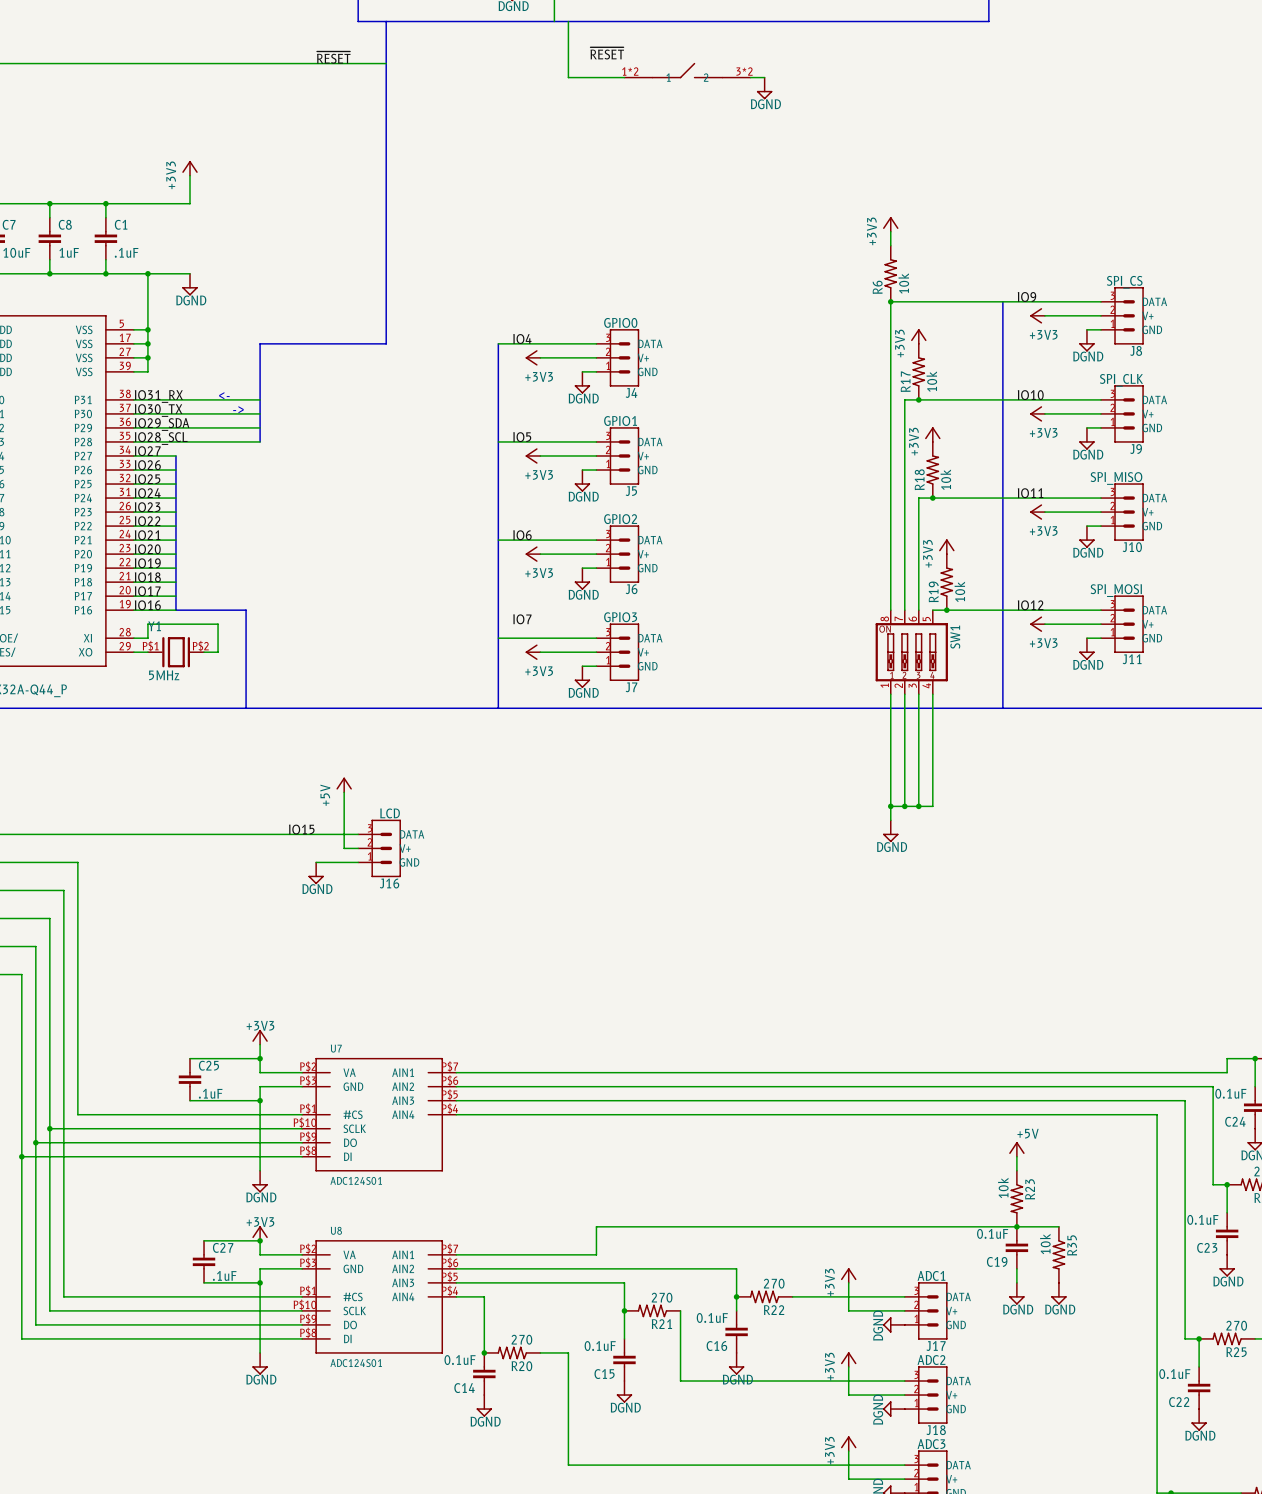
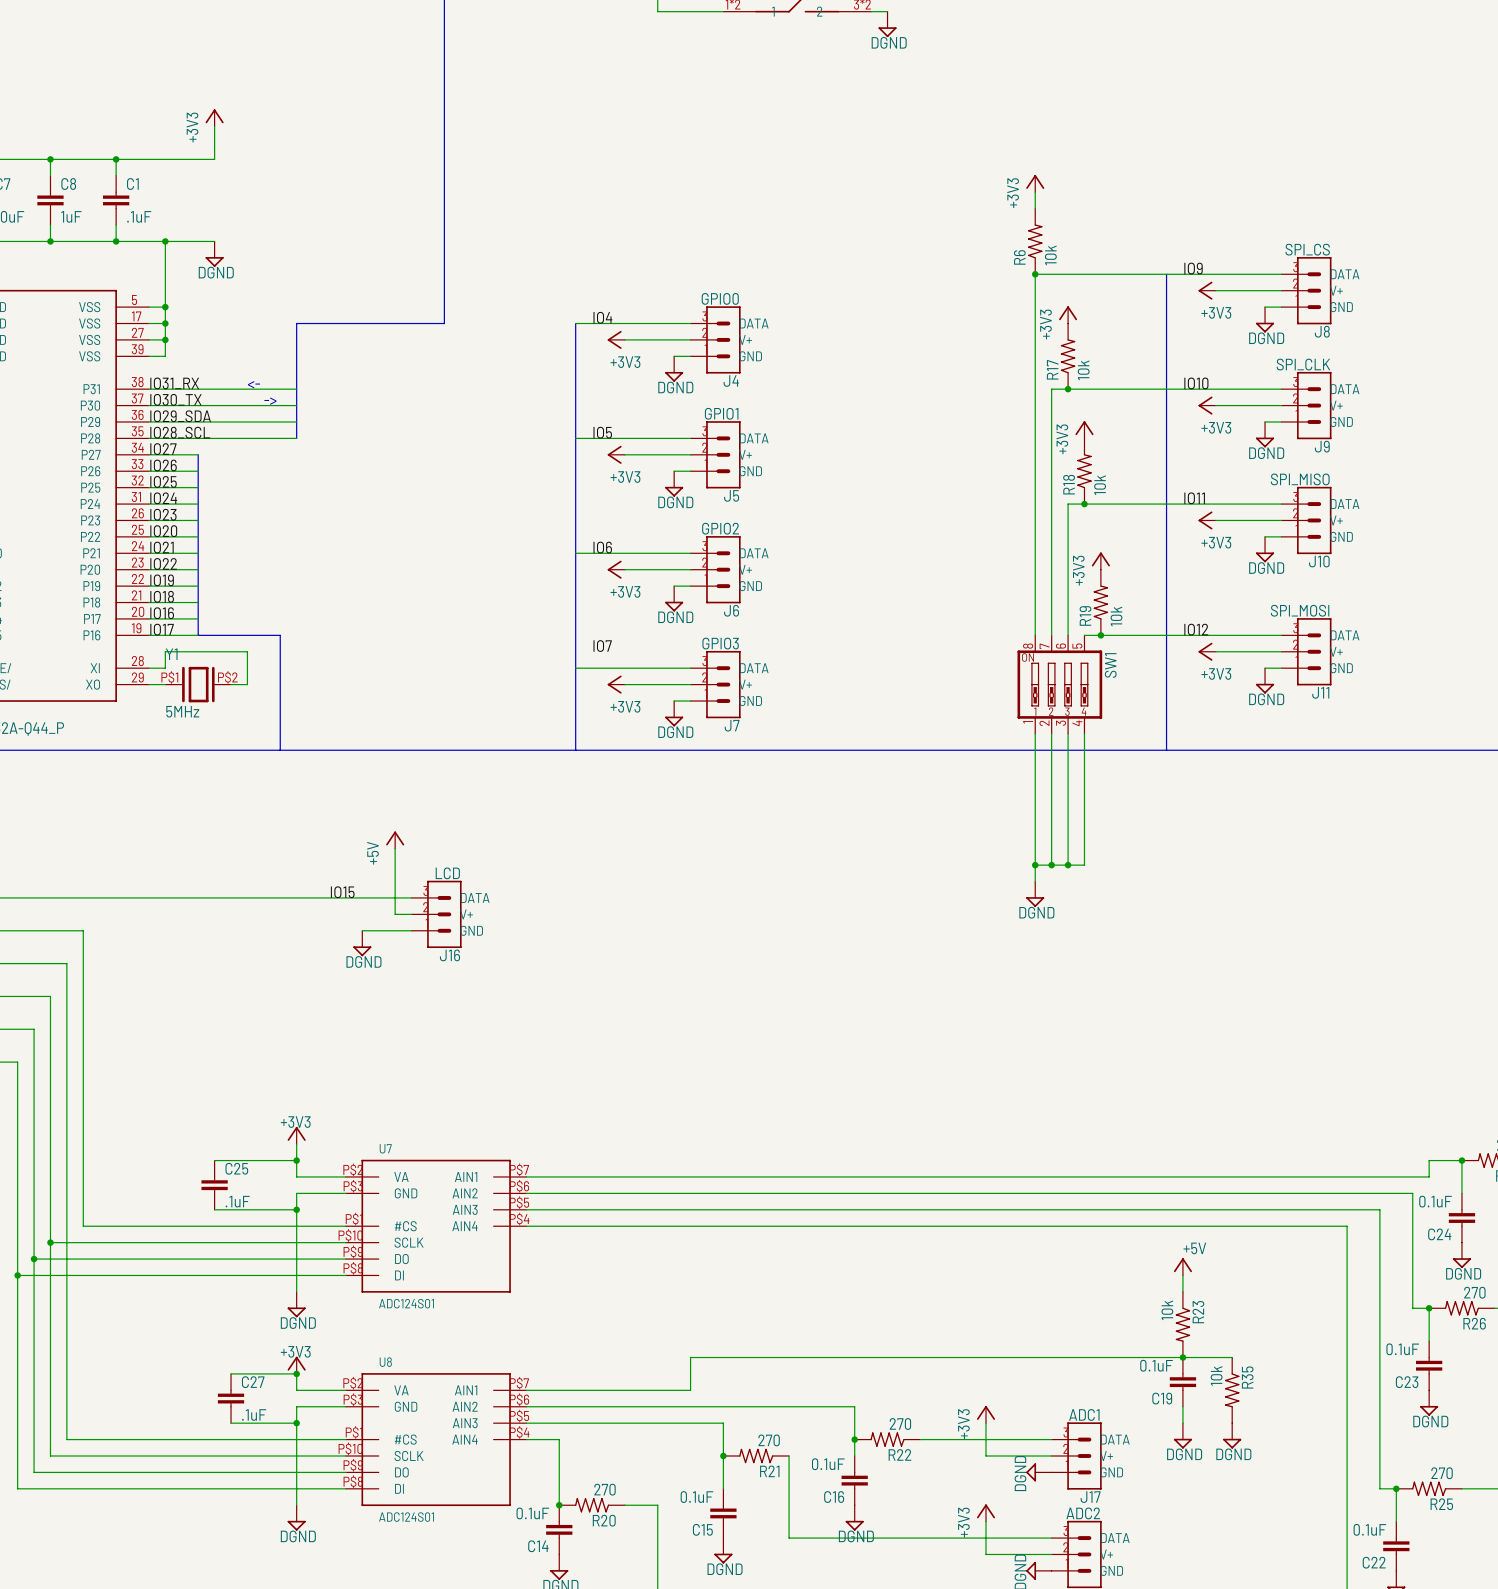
label: IO22 (147, 521) -> IO20 (163, 531)
label: IO20 (147, 549) -> IO22 (163, 563)
label: IO17 (147, 591) -> IO16 (162, 613)
label: IO16 (147, 605) -> IO17 (162, 629)

